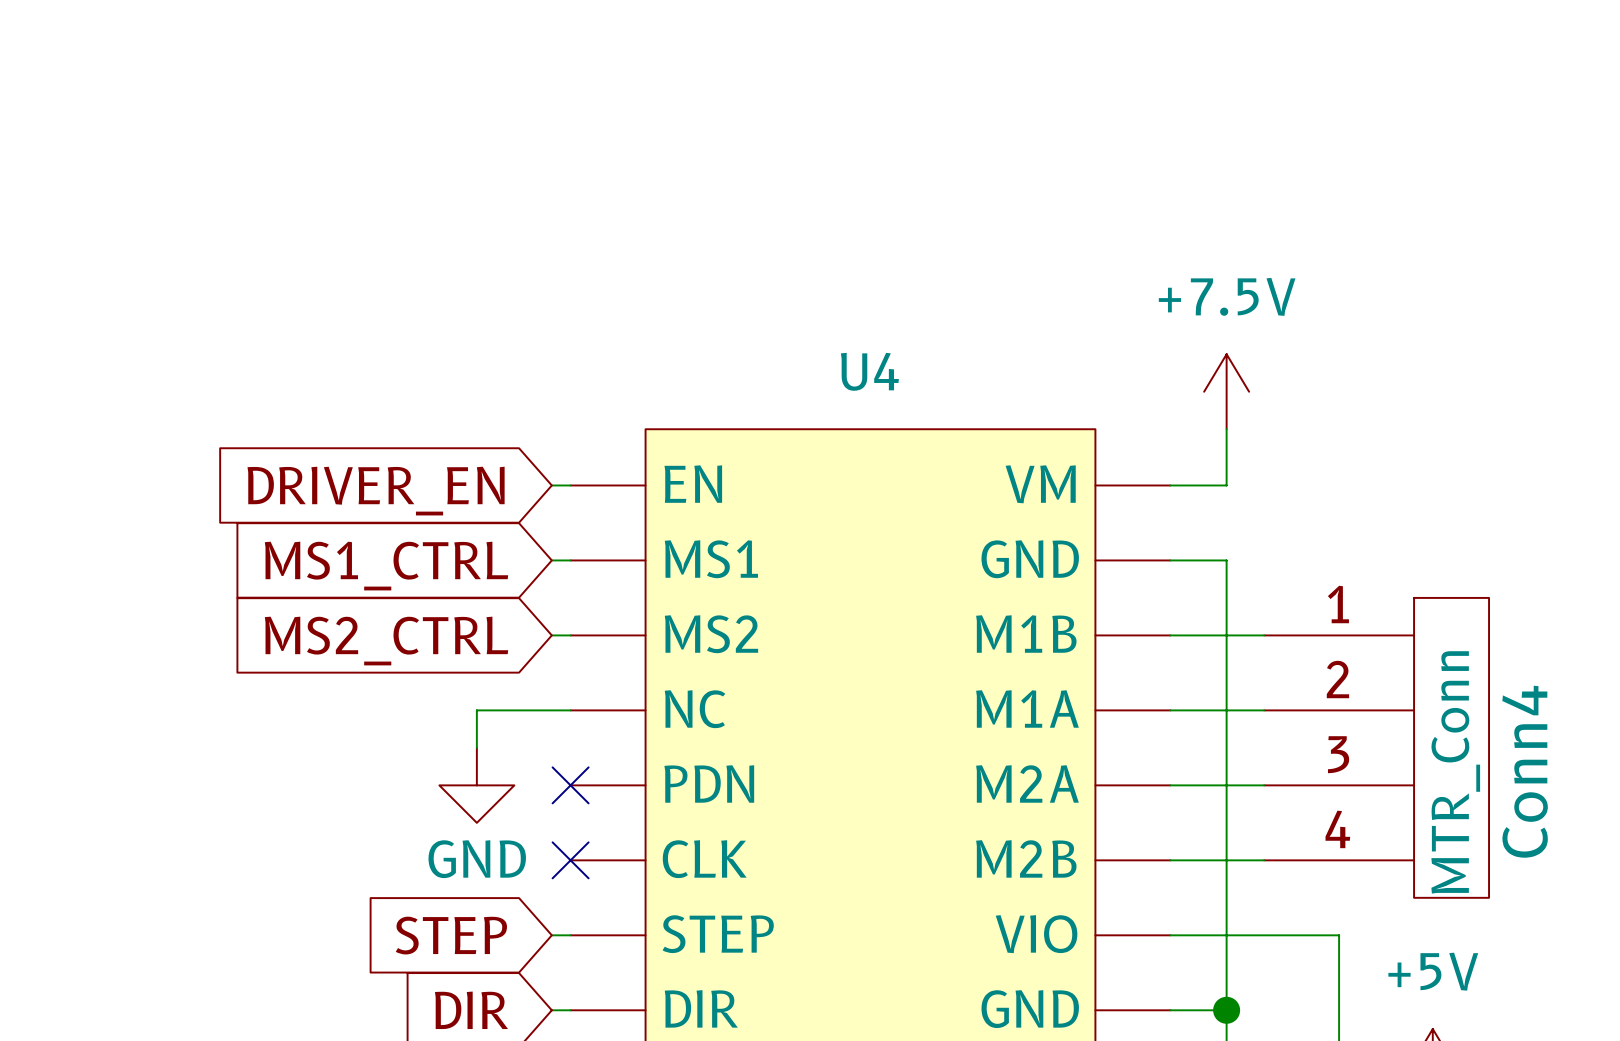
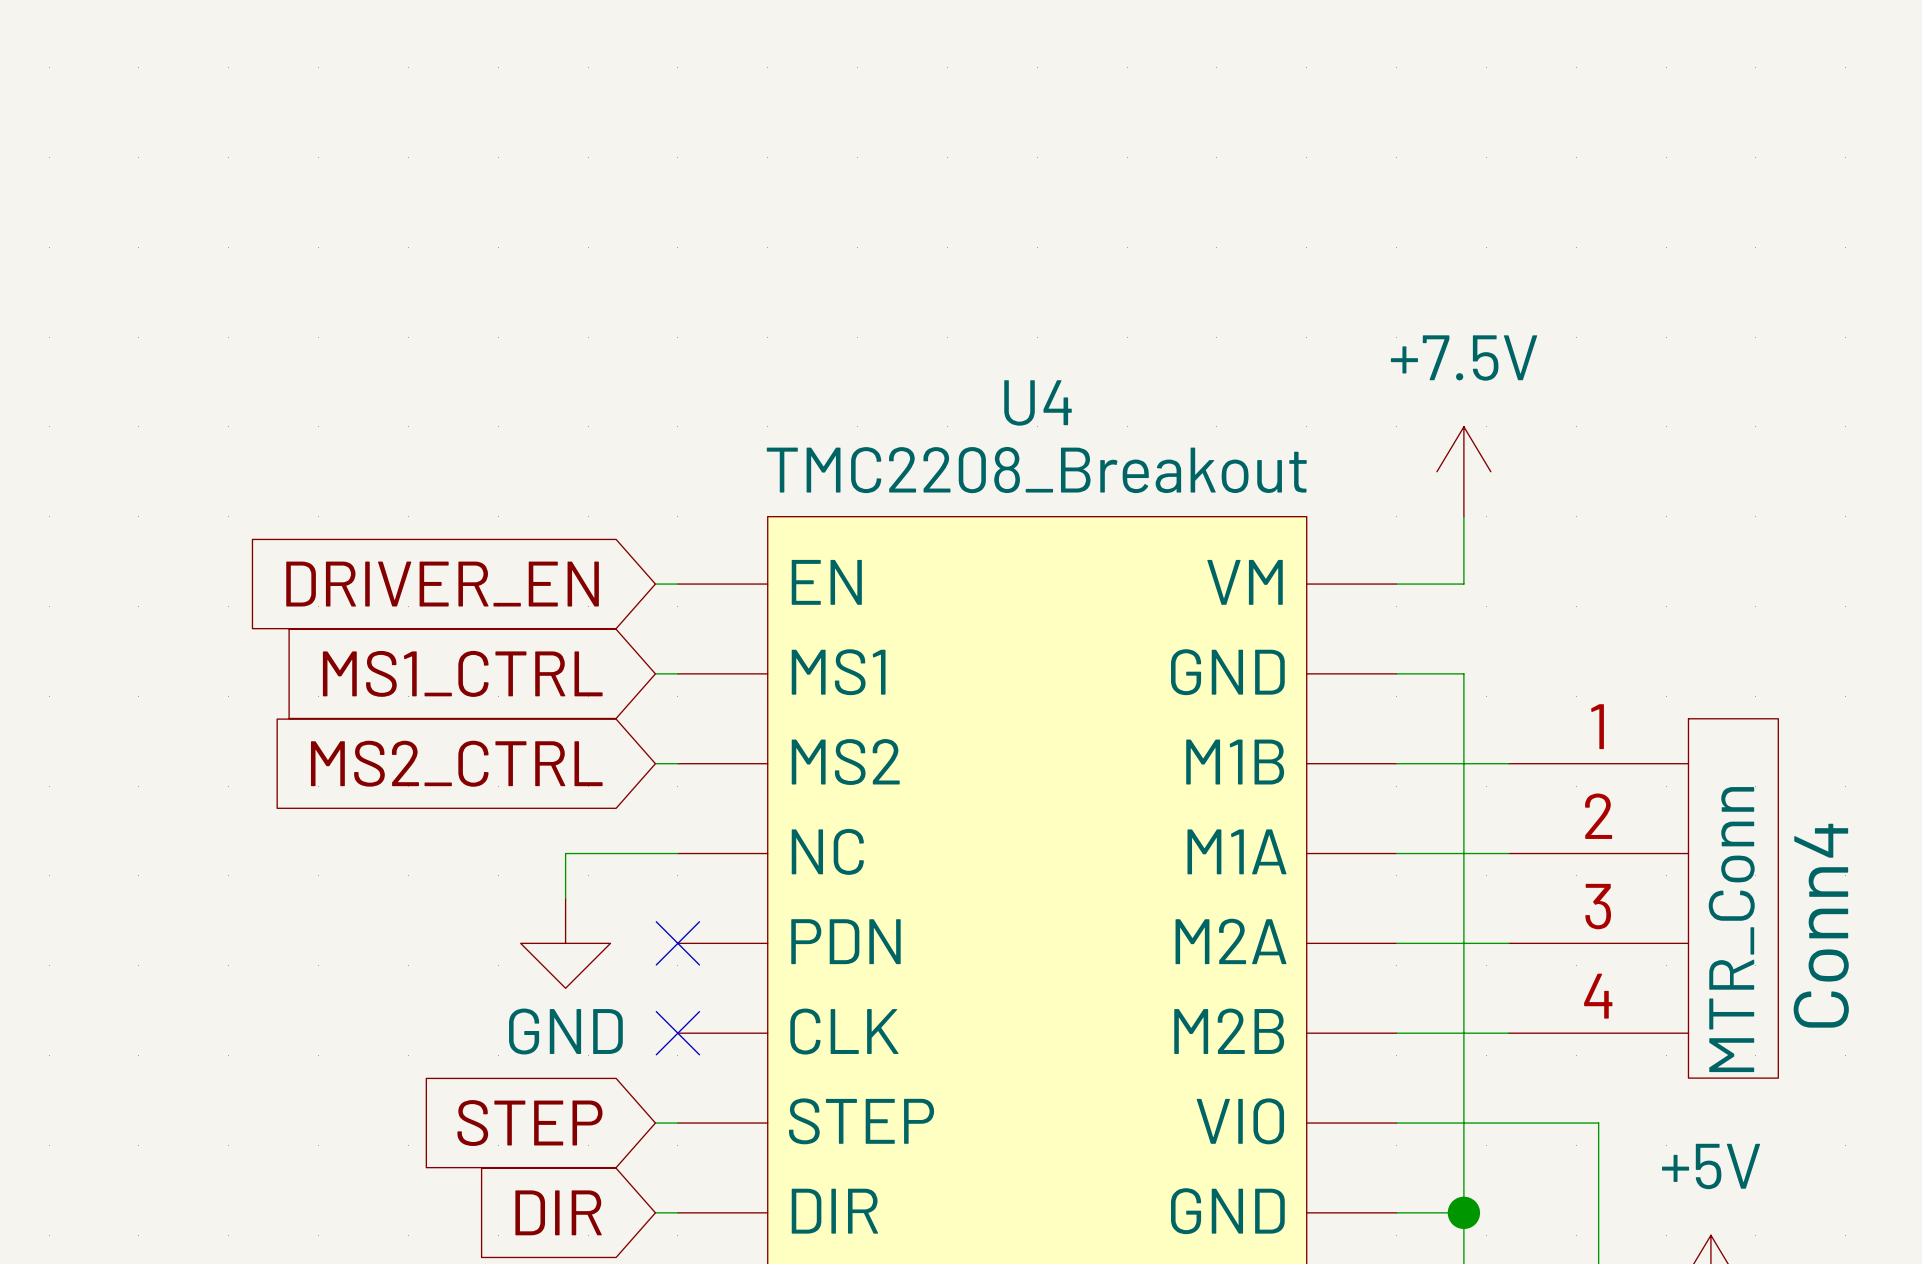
U4 name position: U4 (869, 371) -> U4 (1038, 402)
U4 value: none -> TMC2208_Breakout (1036, 470)

